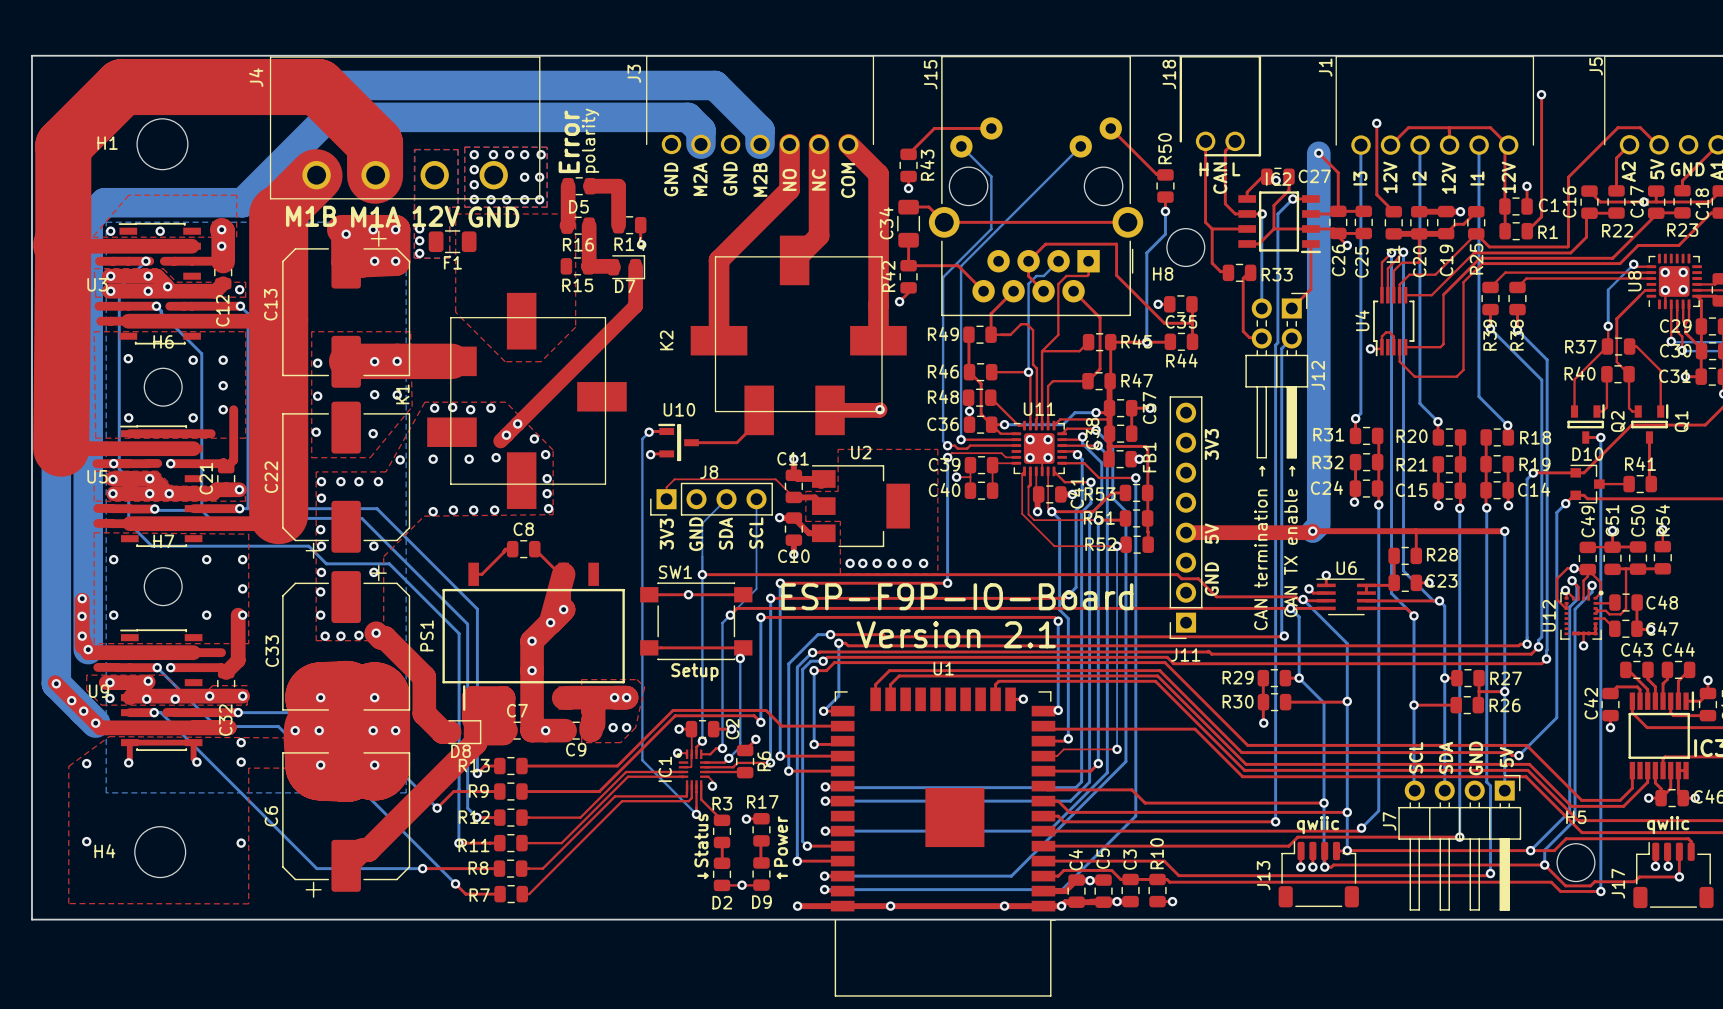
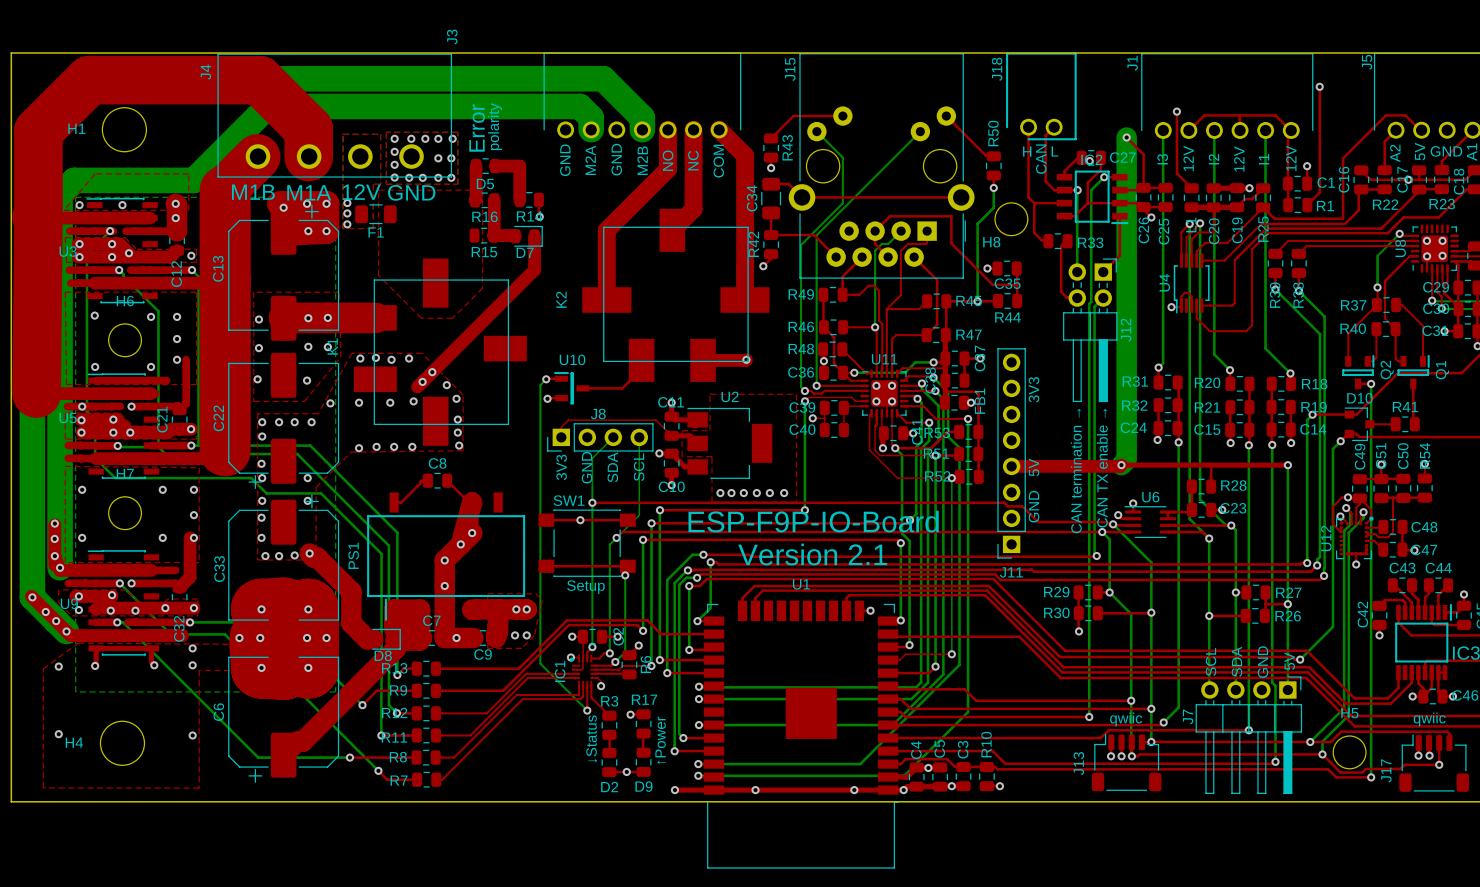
J3 name position: J3 (634, 73) -> J3 (452, 37)

